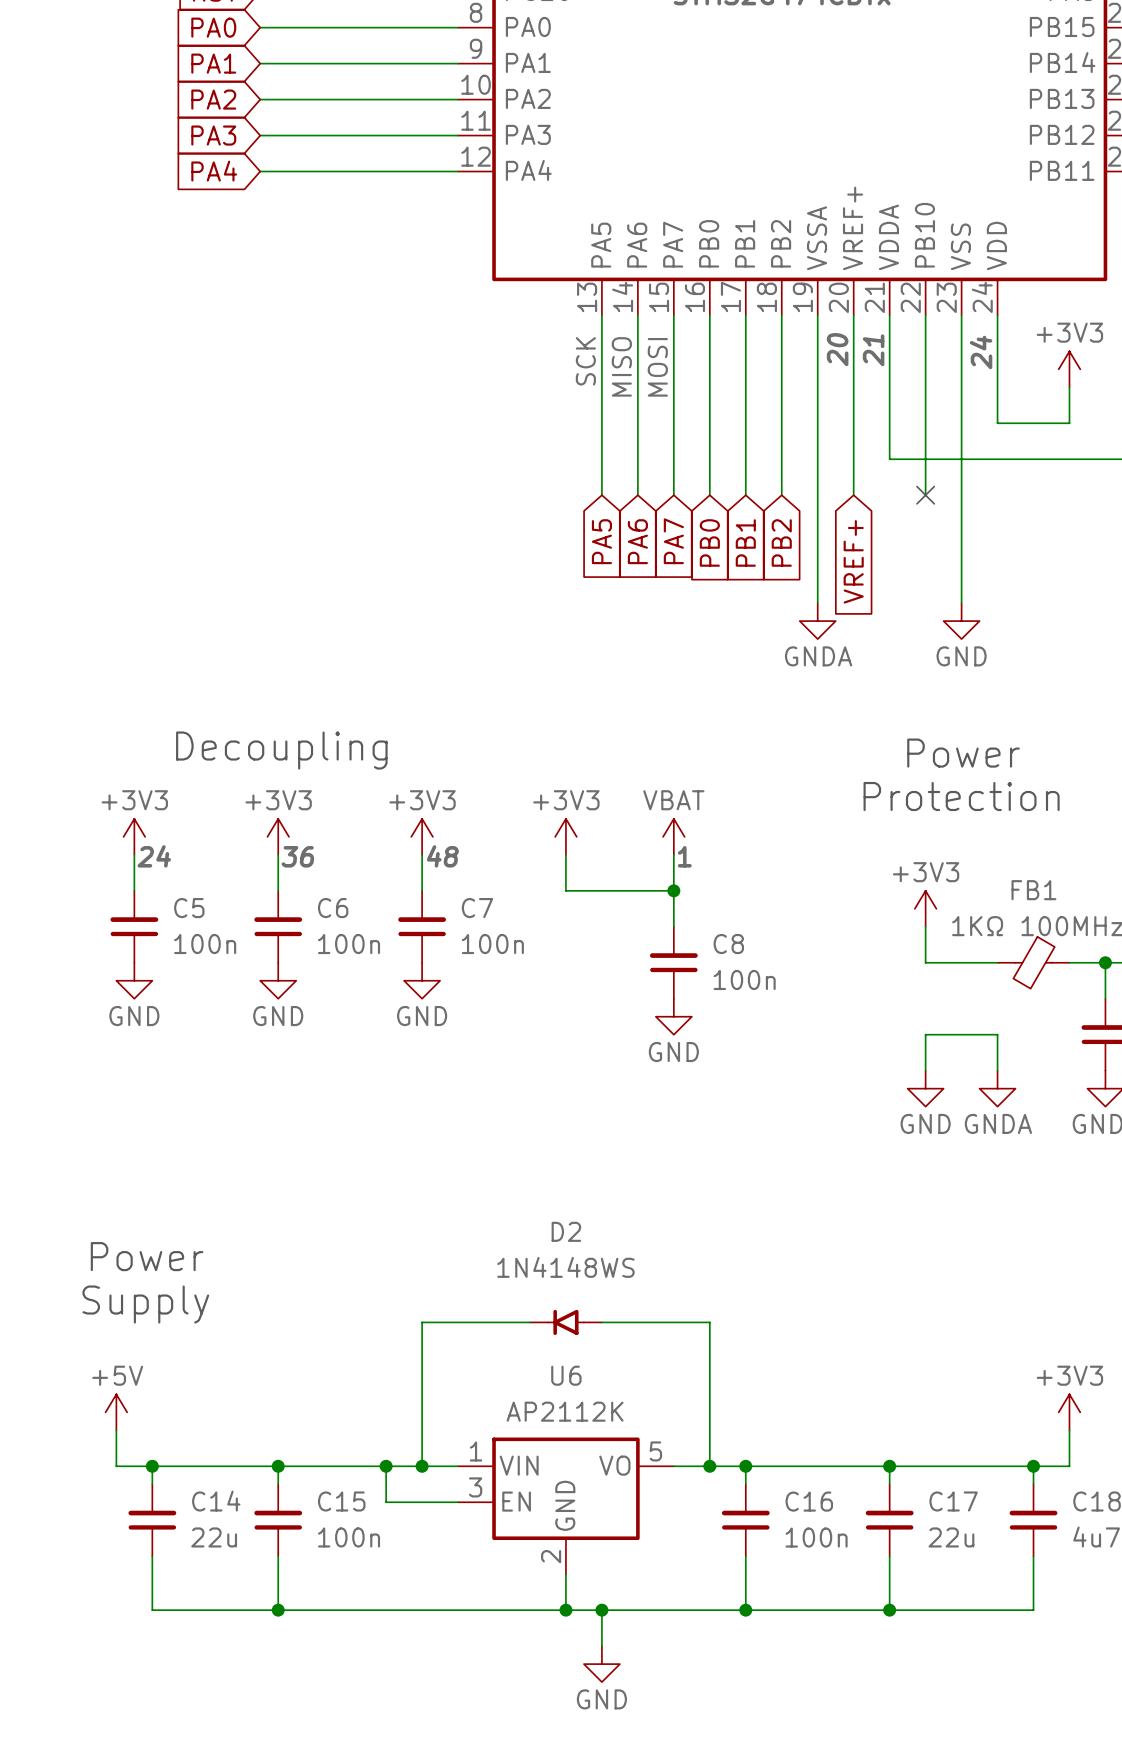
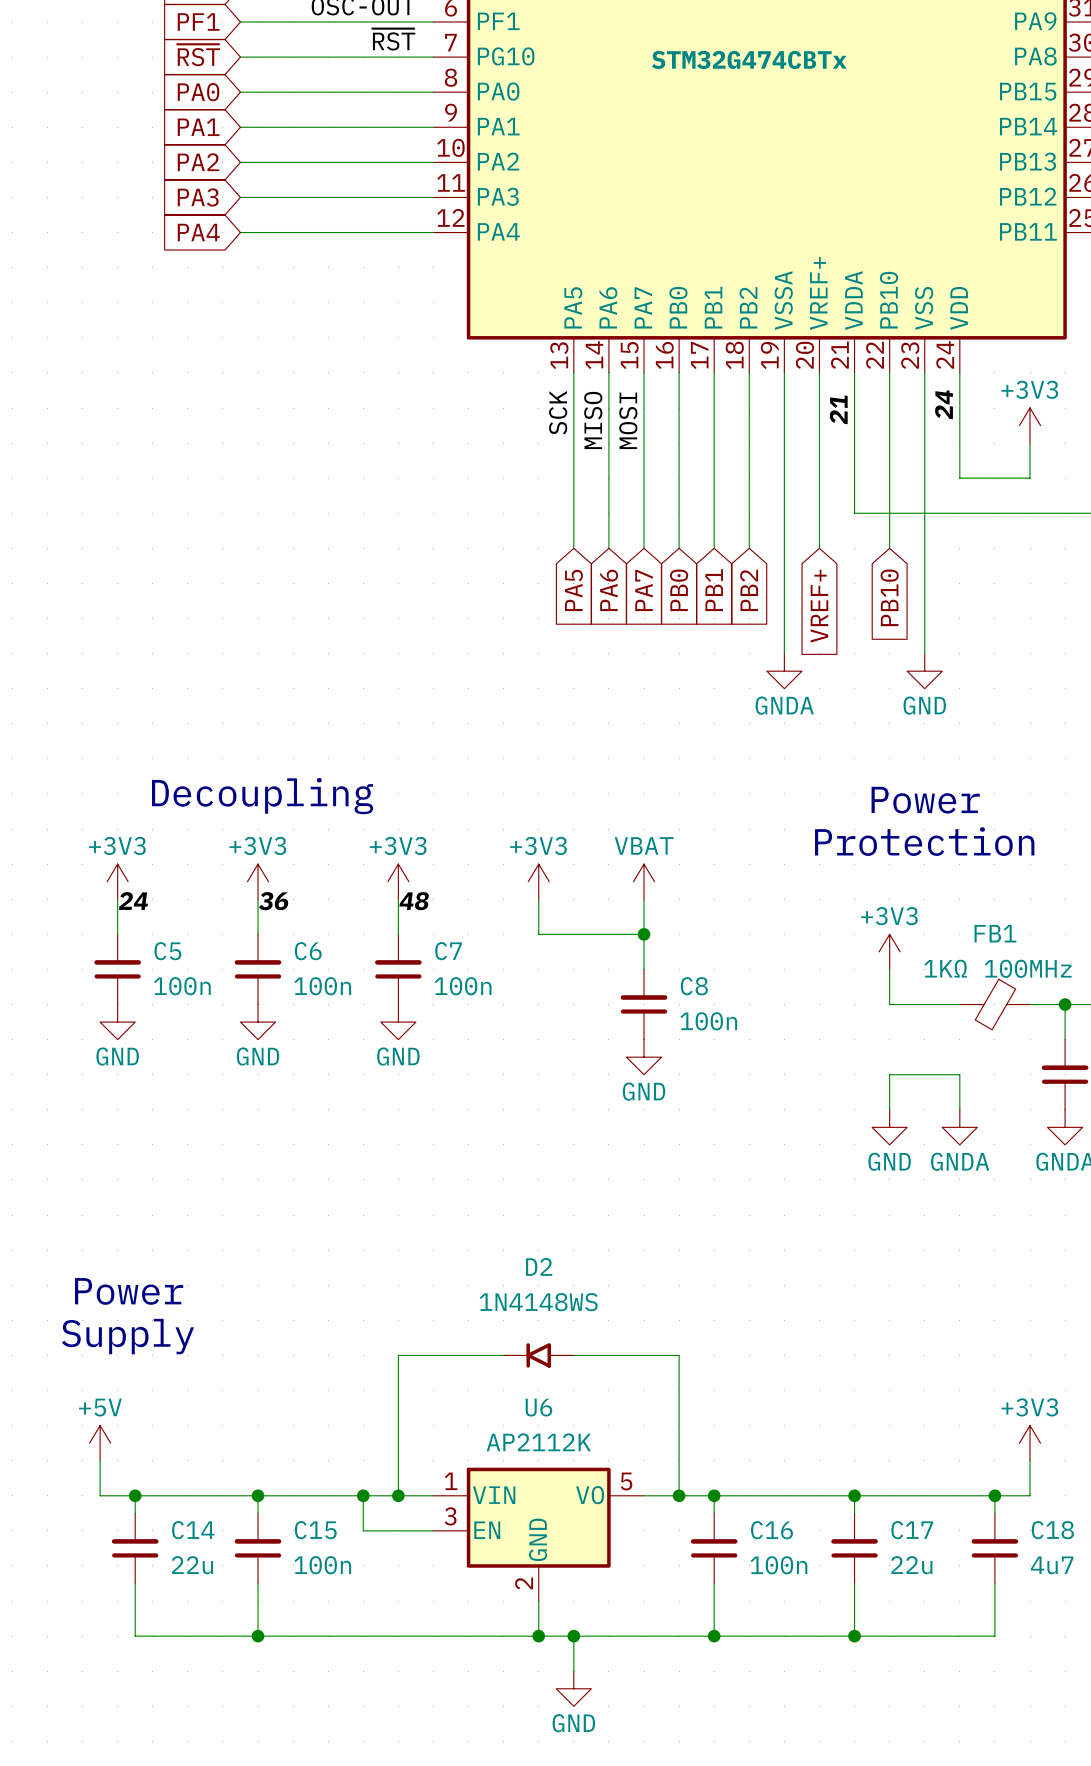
label: 20 (837, 349) -> none
no-connect mark: (925, 495) -> none
global label: none -> PB10 (889, 597)
label: 1 (684, 856) -> none

